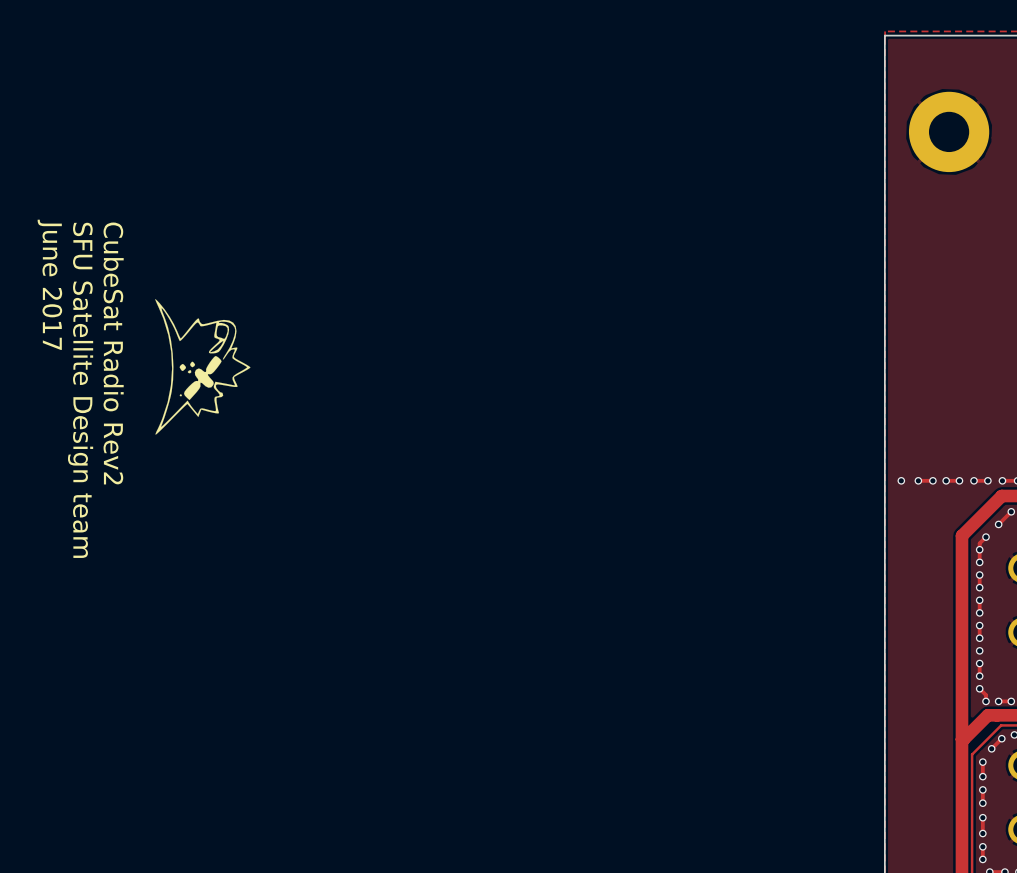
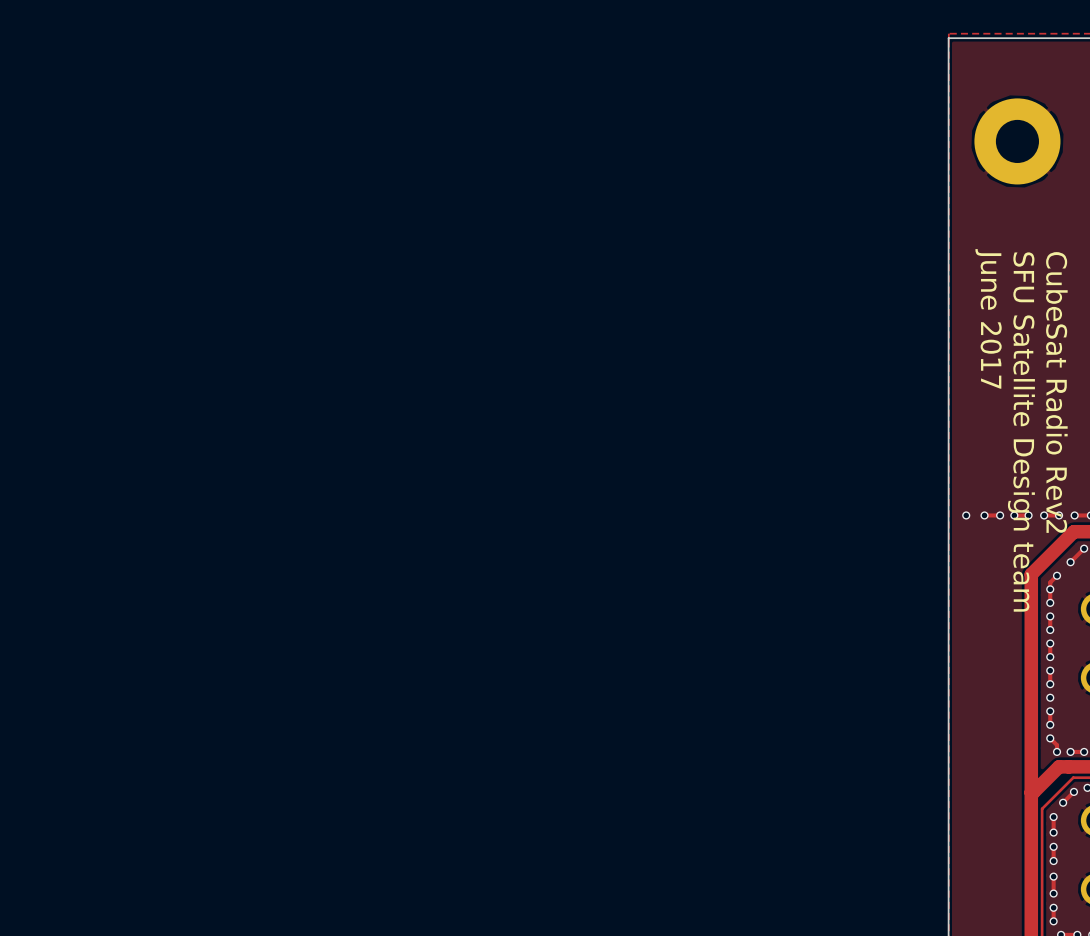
text: June 2017 (49, 284) -> none
text: none -> June 2017 (988, 318)
drawing: [155, 299, 251, 435] -> none
text: CubeSat Radio Rev2 (113, 353) -> none
text: none -> CubeSat Radio Rev2 (1056, 392)
text: SFU Satellite Design team (80, 390) -> none
text: none -> SFU Satellite Design team (1021, 432)

